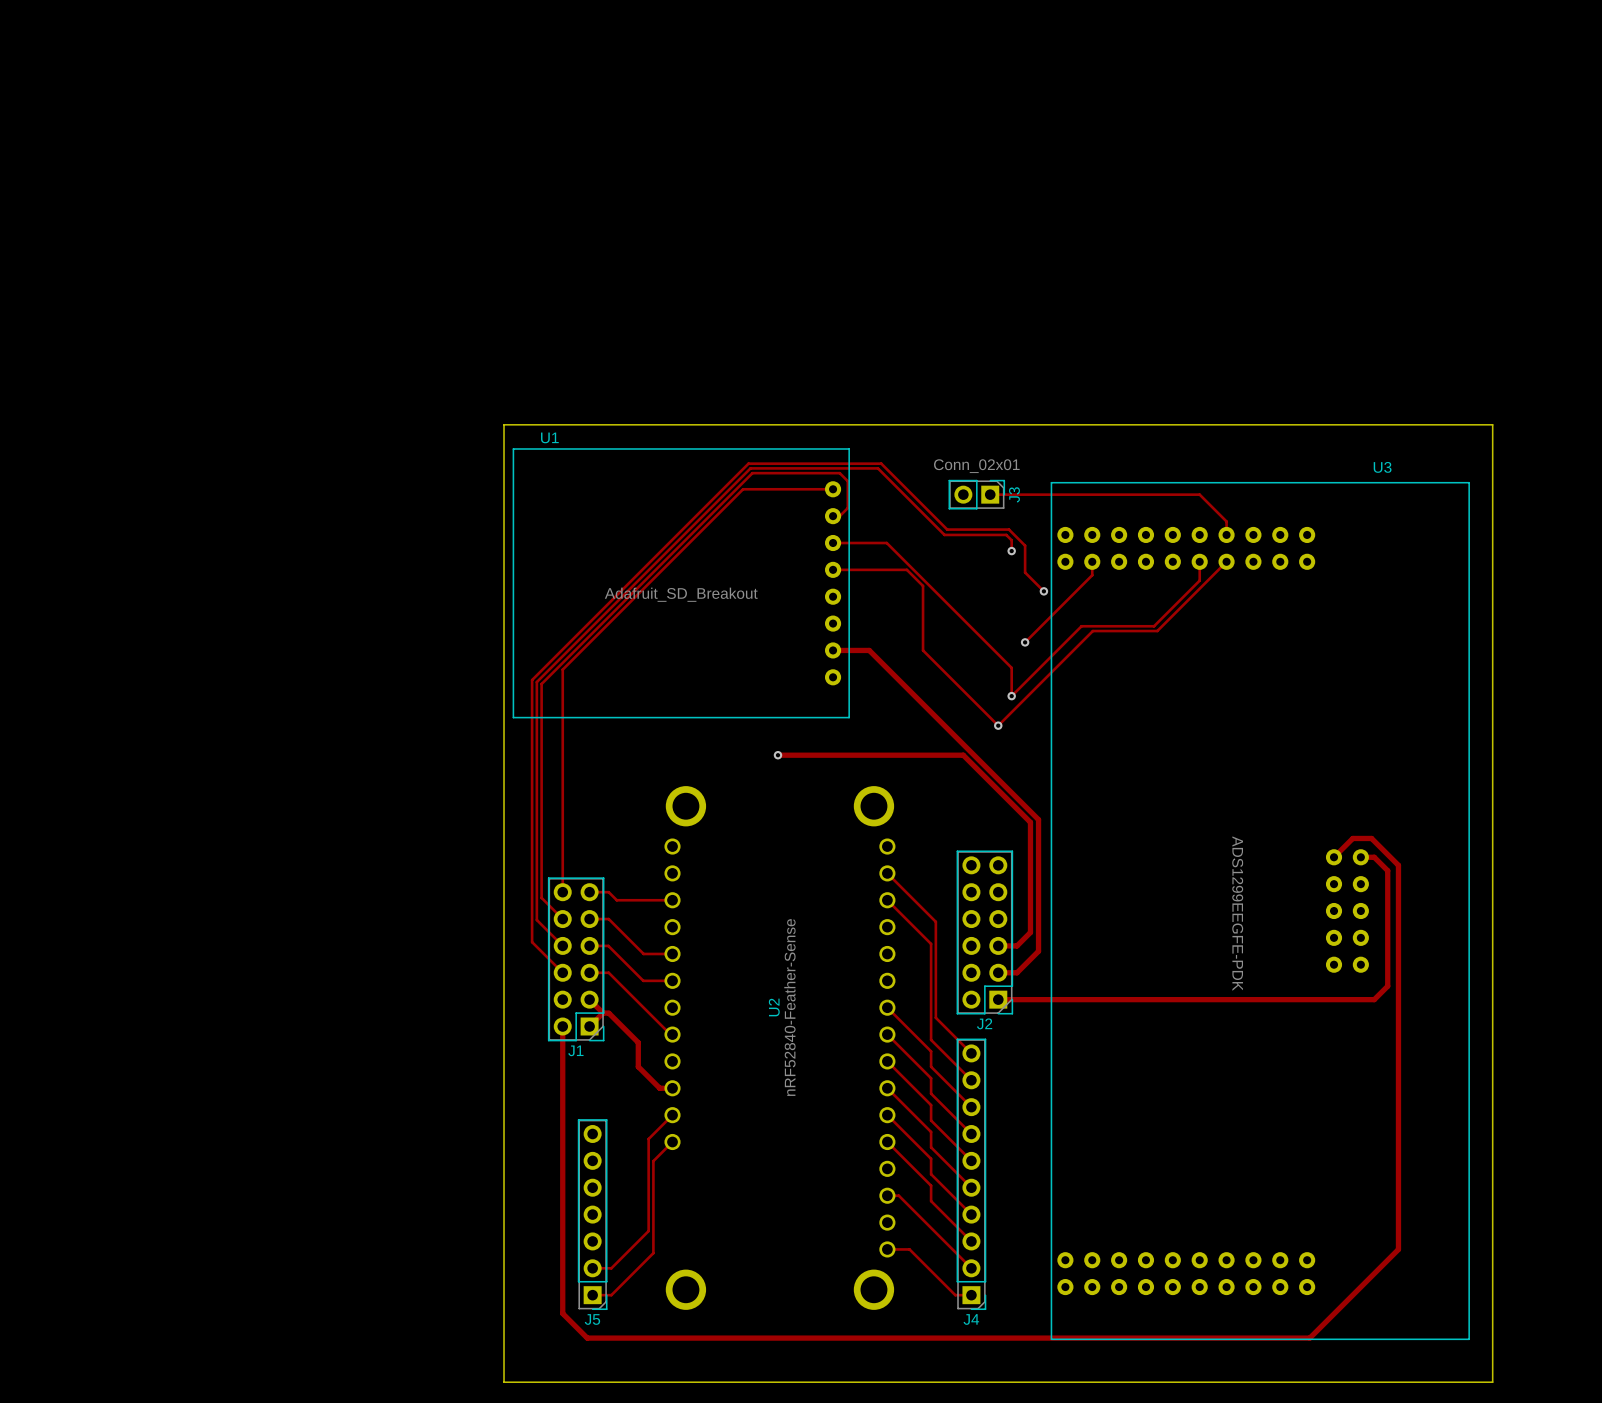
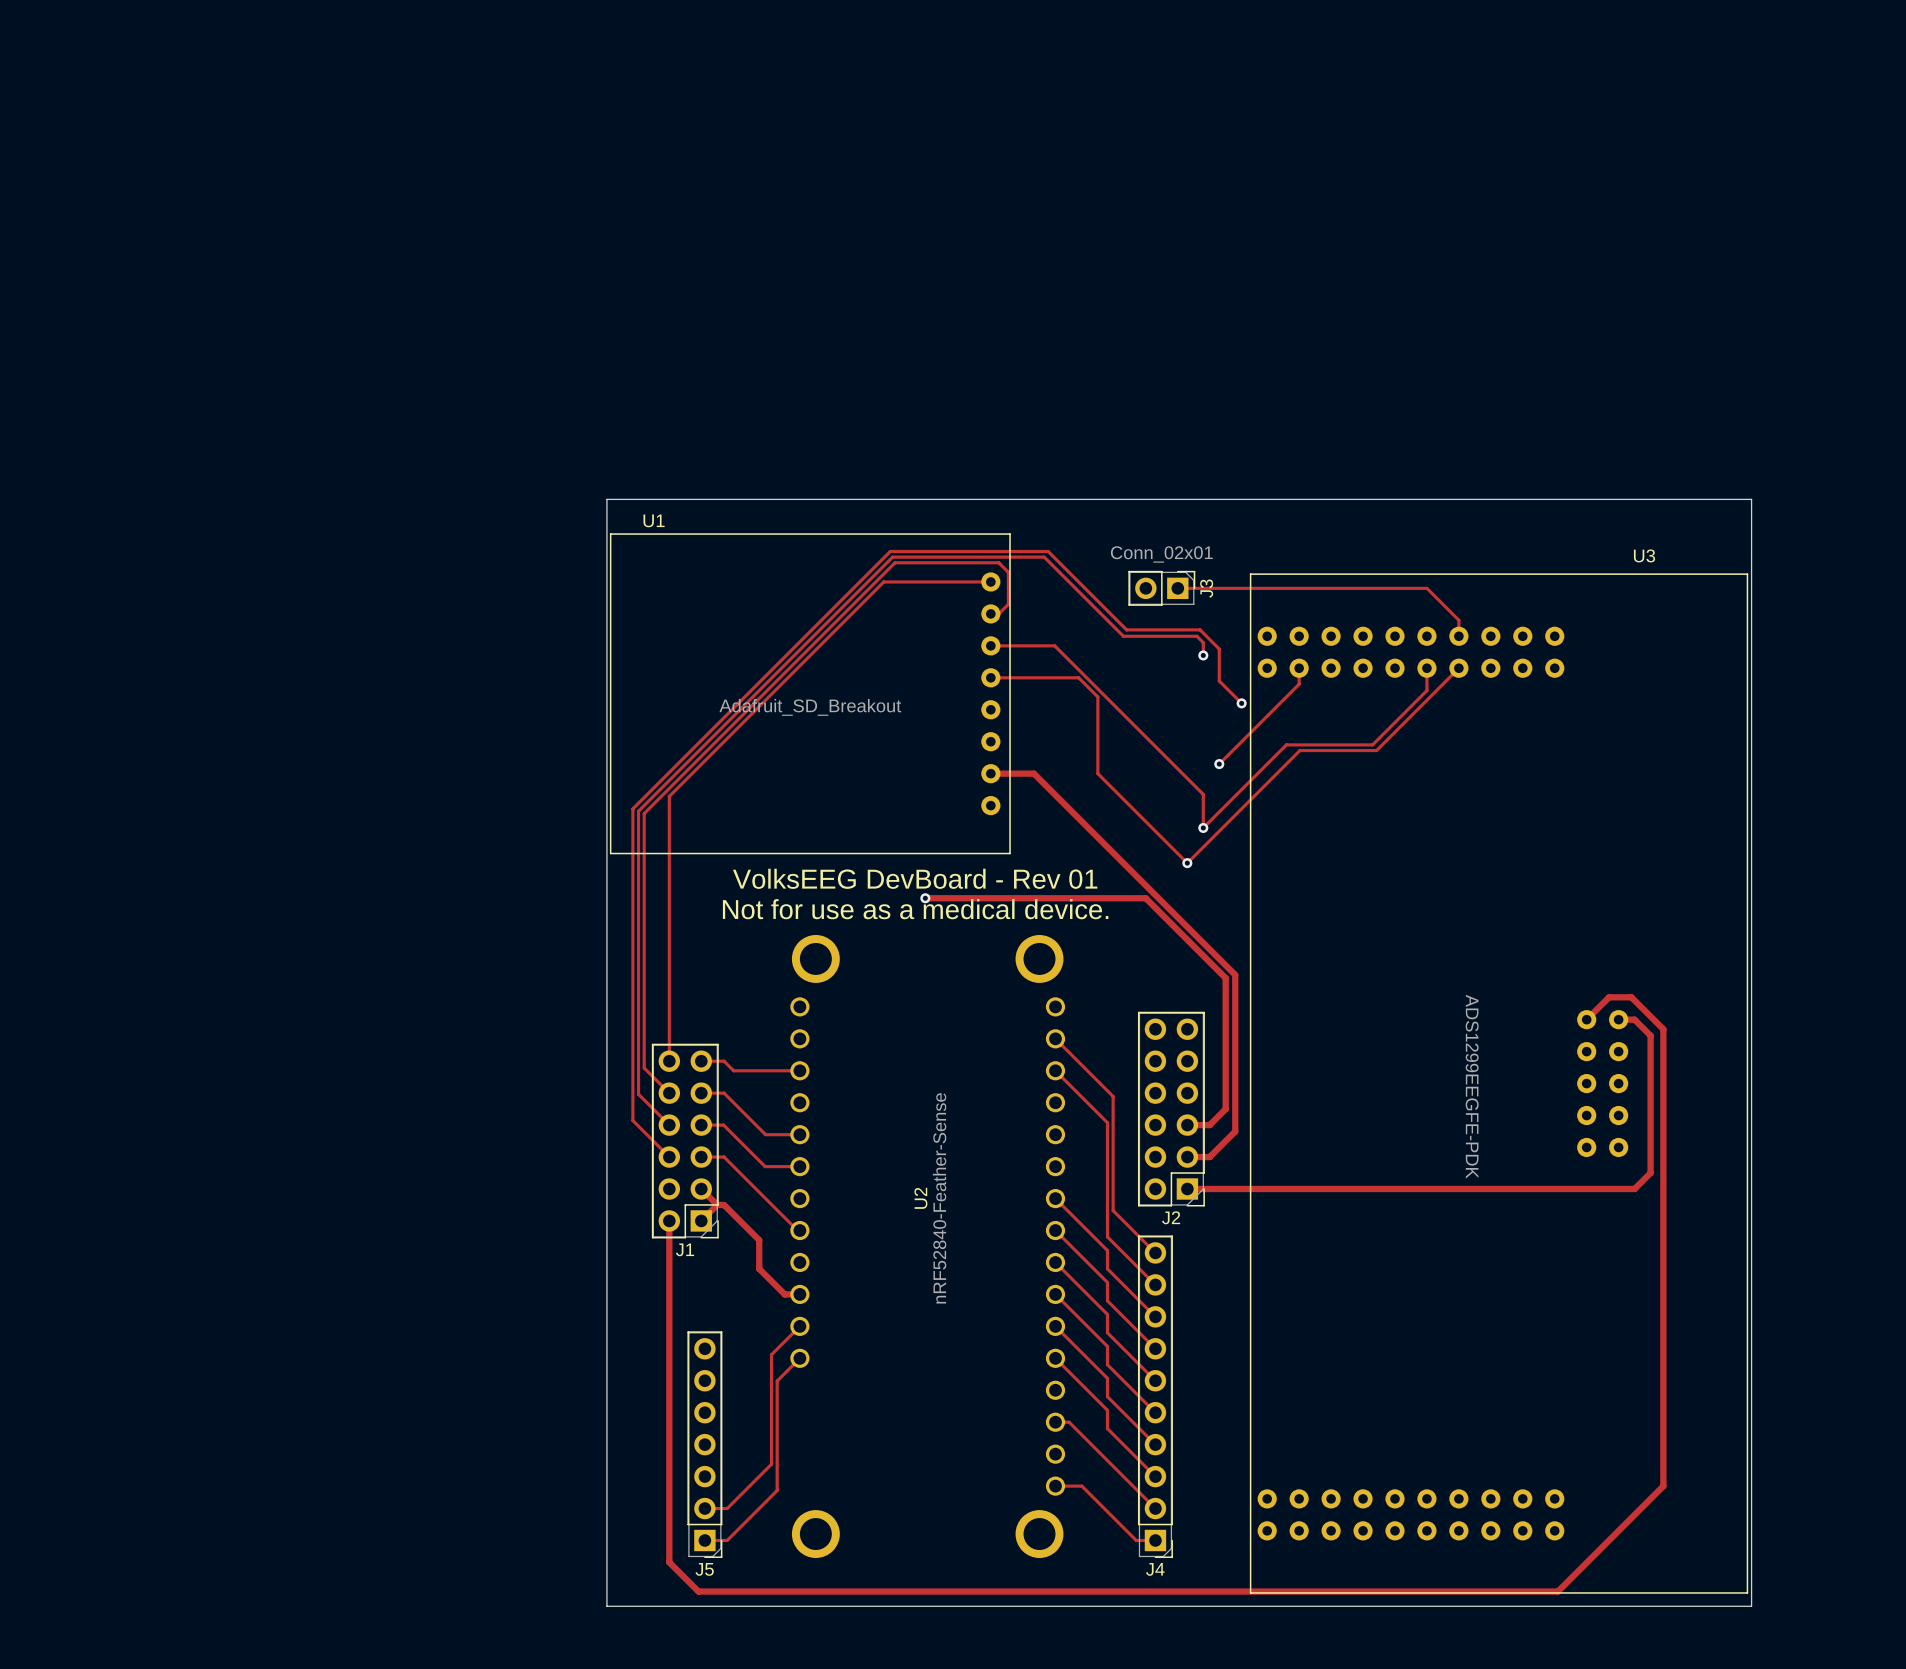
board edge: (504, 424) (1492, 424) (1492, 1382) (504, 1382) (504, 424) -> (606, 499) (606, 1606) (1751, 1606) (1751, 499) (606, 499)
text: none -> VolksEEG DevBoard - Rev 01 (915, 878)
text: none -> Not for use as a medical device. (915, 909)

